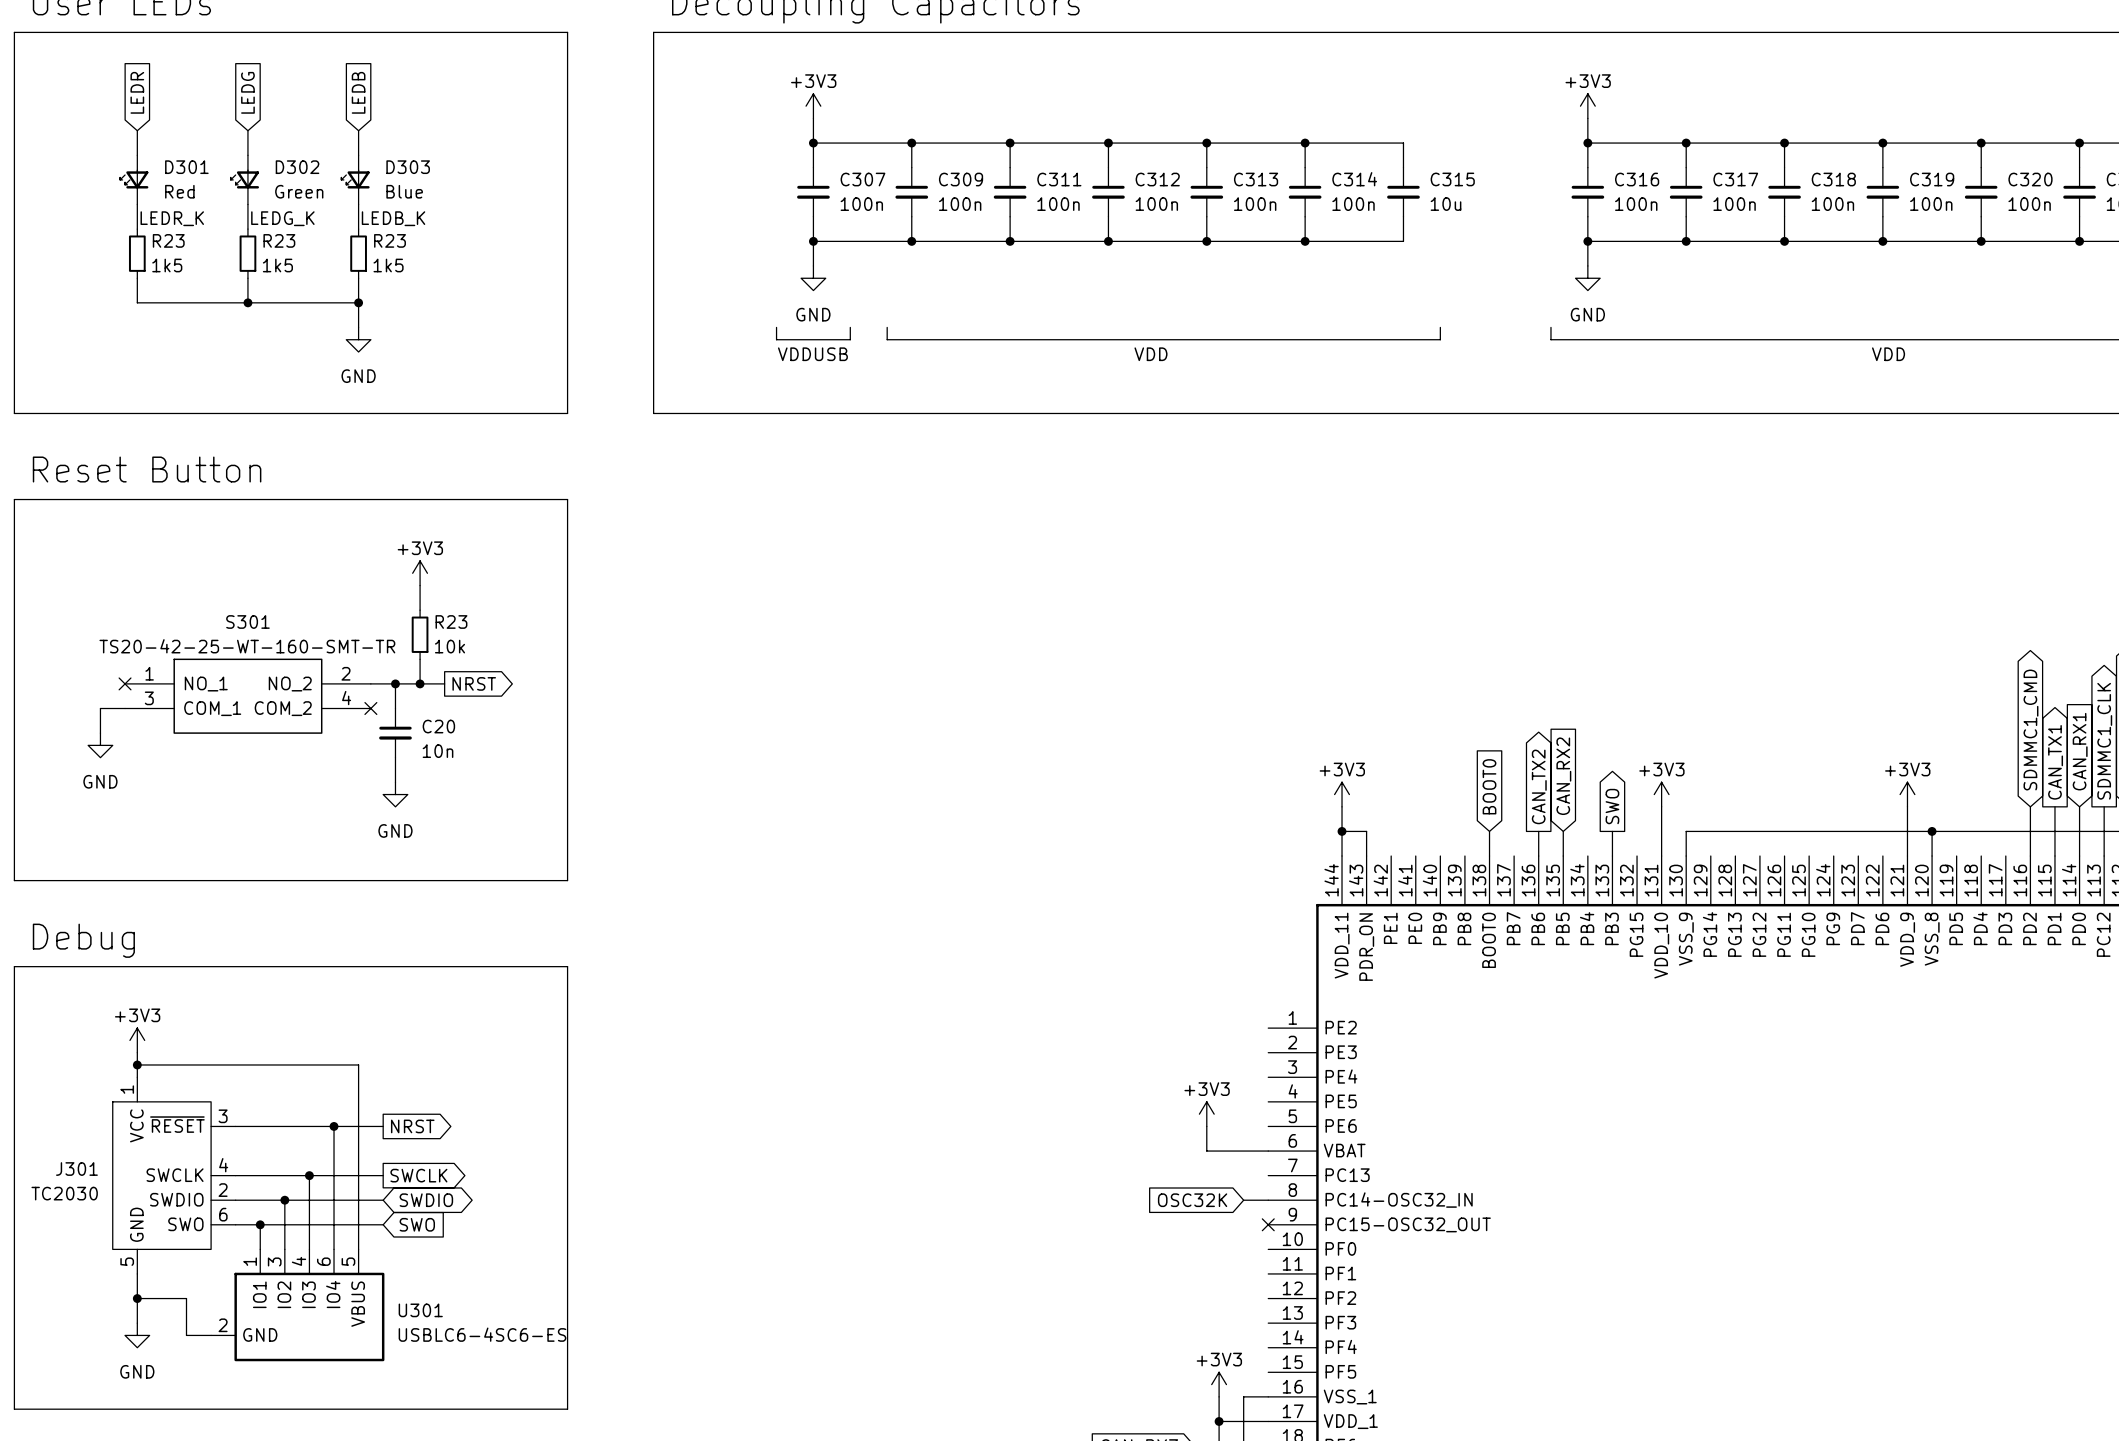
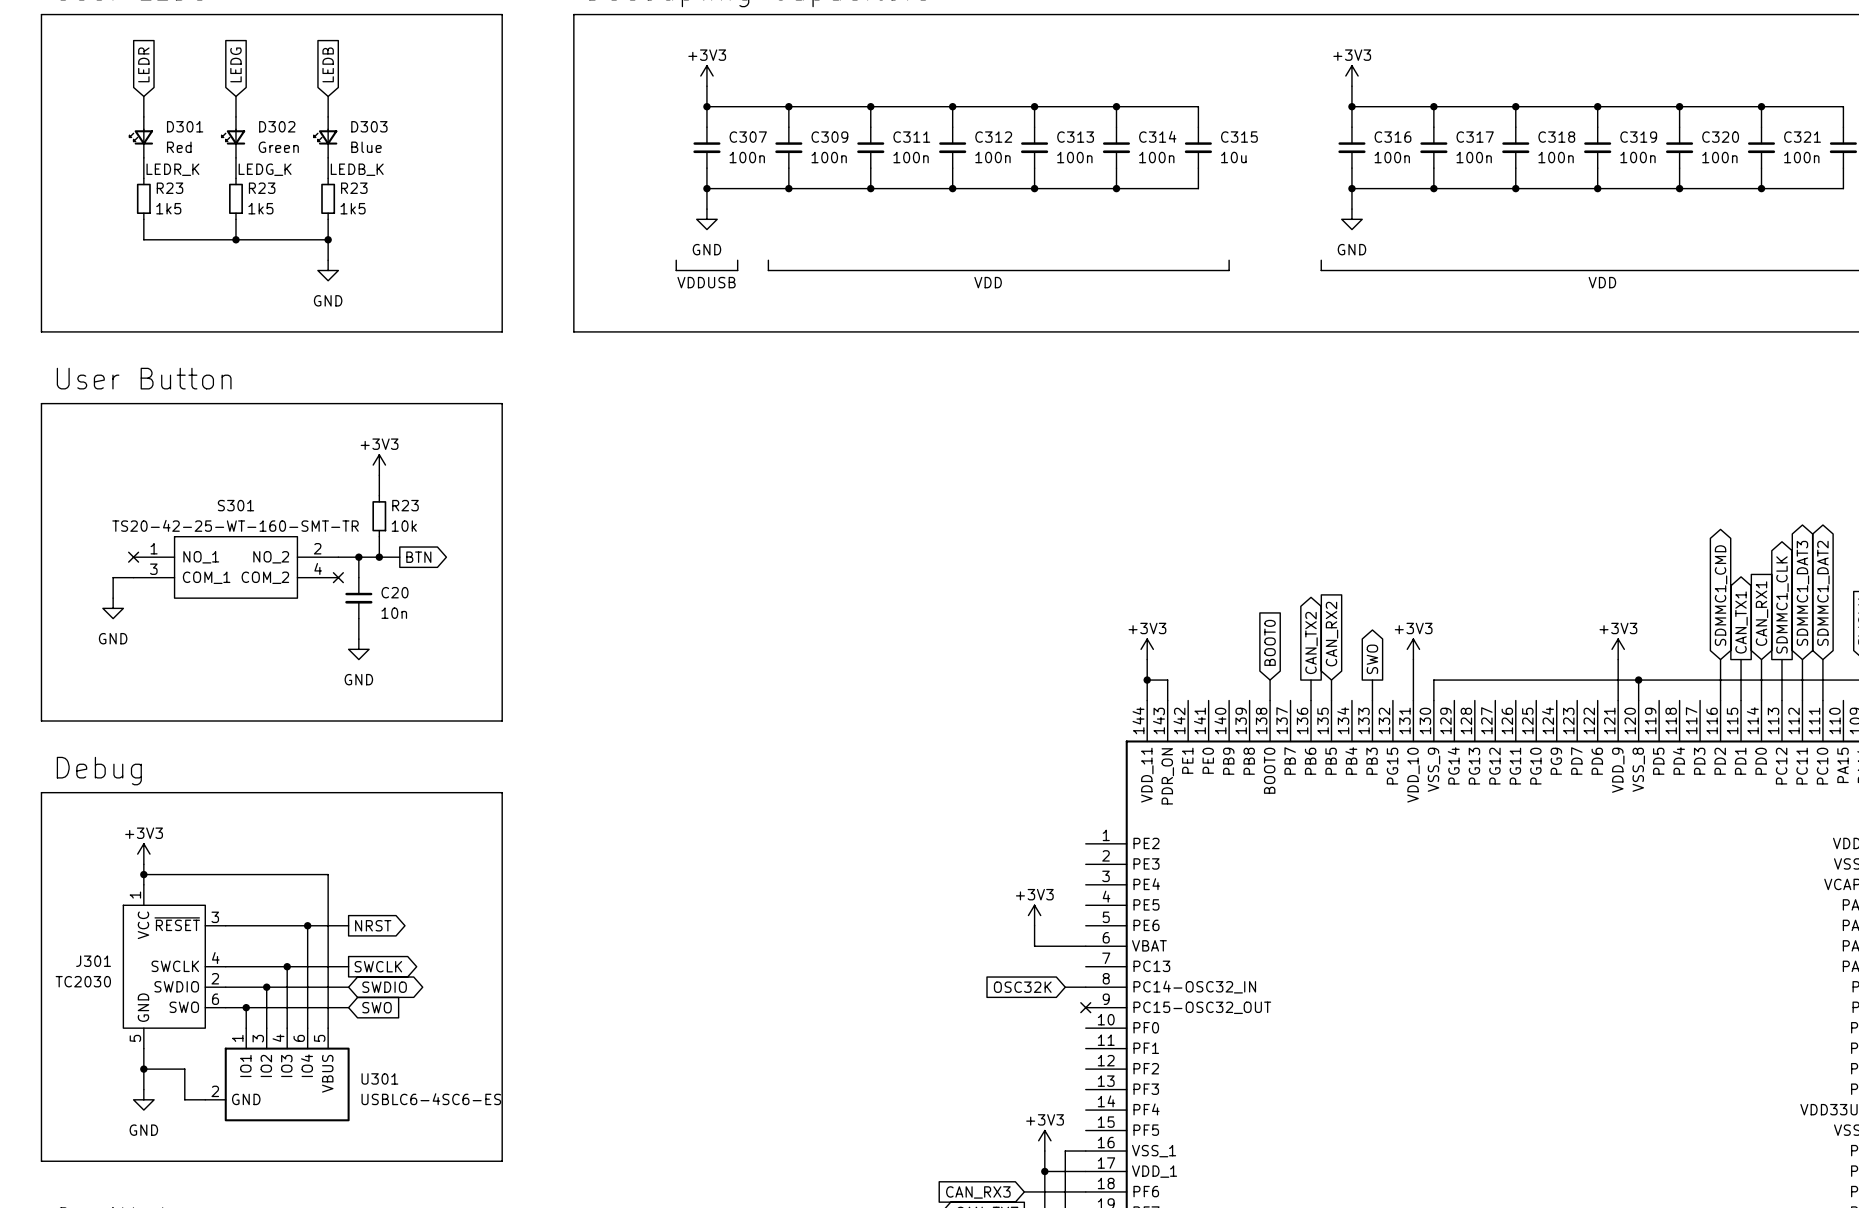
text: Reset Button (147, 469) -> User Button (144, 378)
global label: NRST (474, 683) -> BTN (418, 557)

